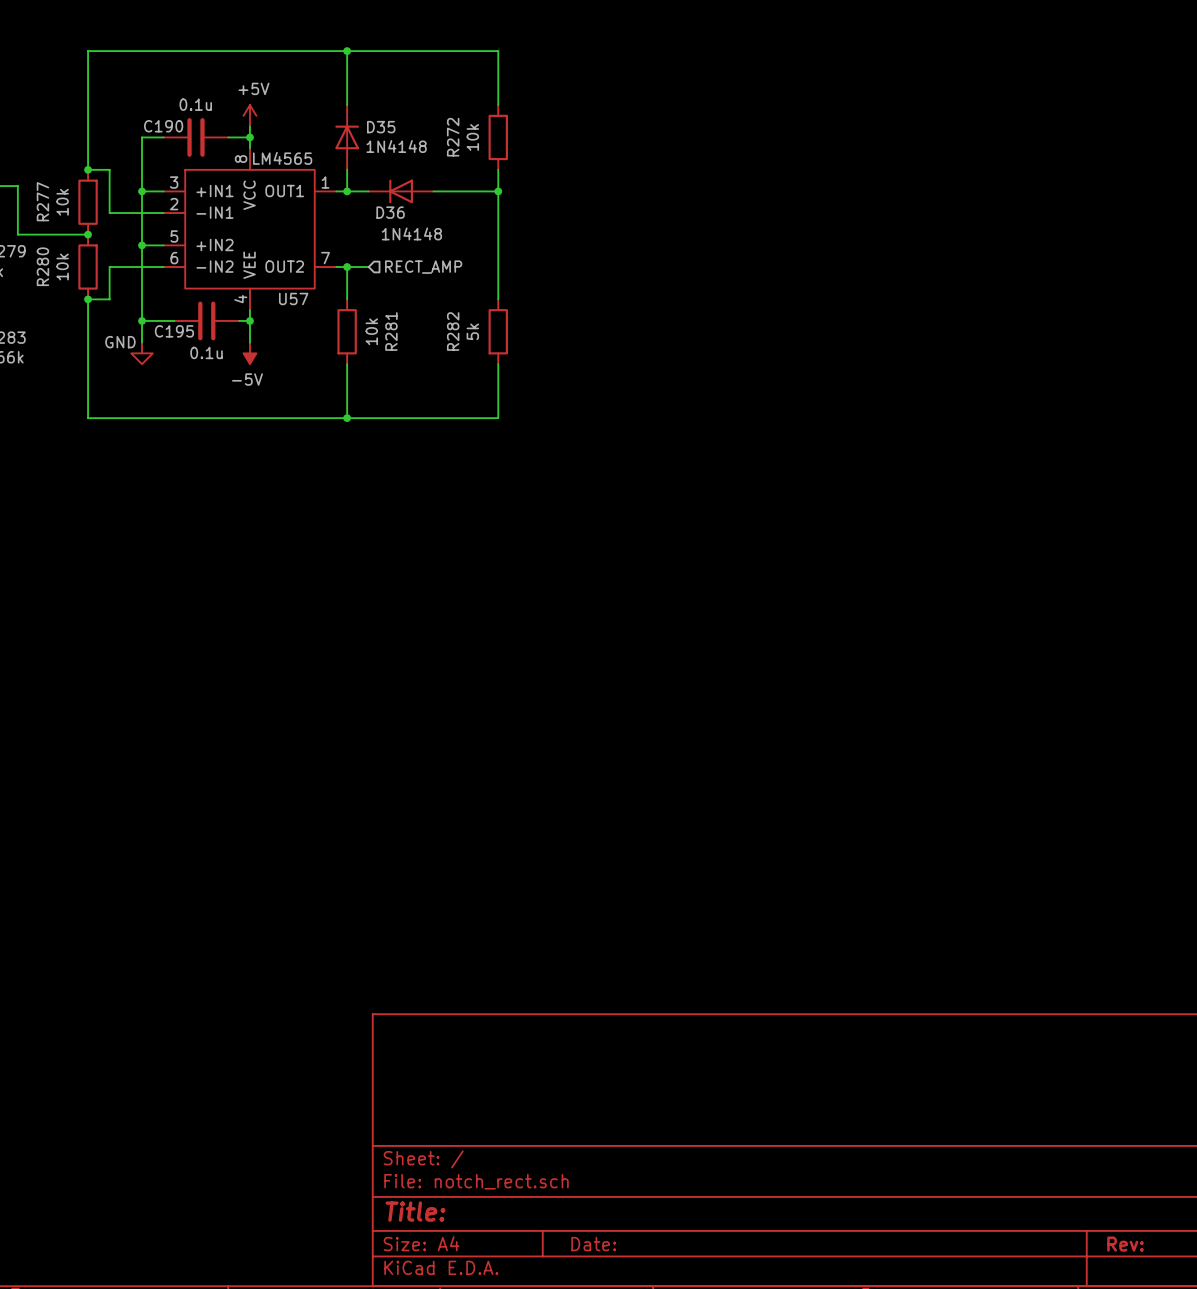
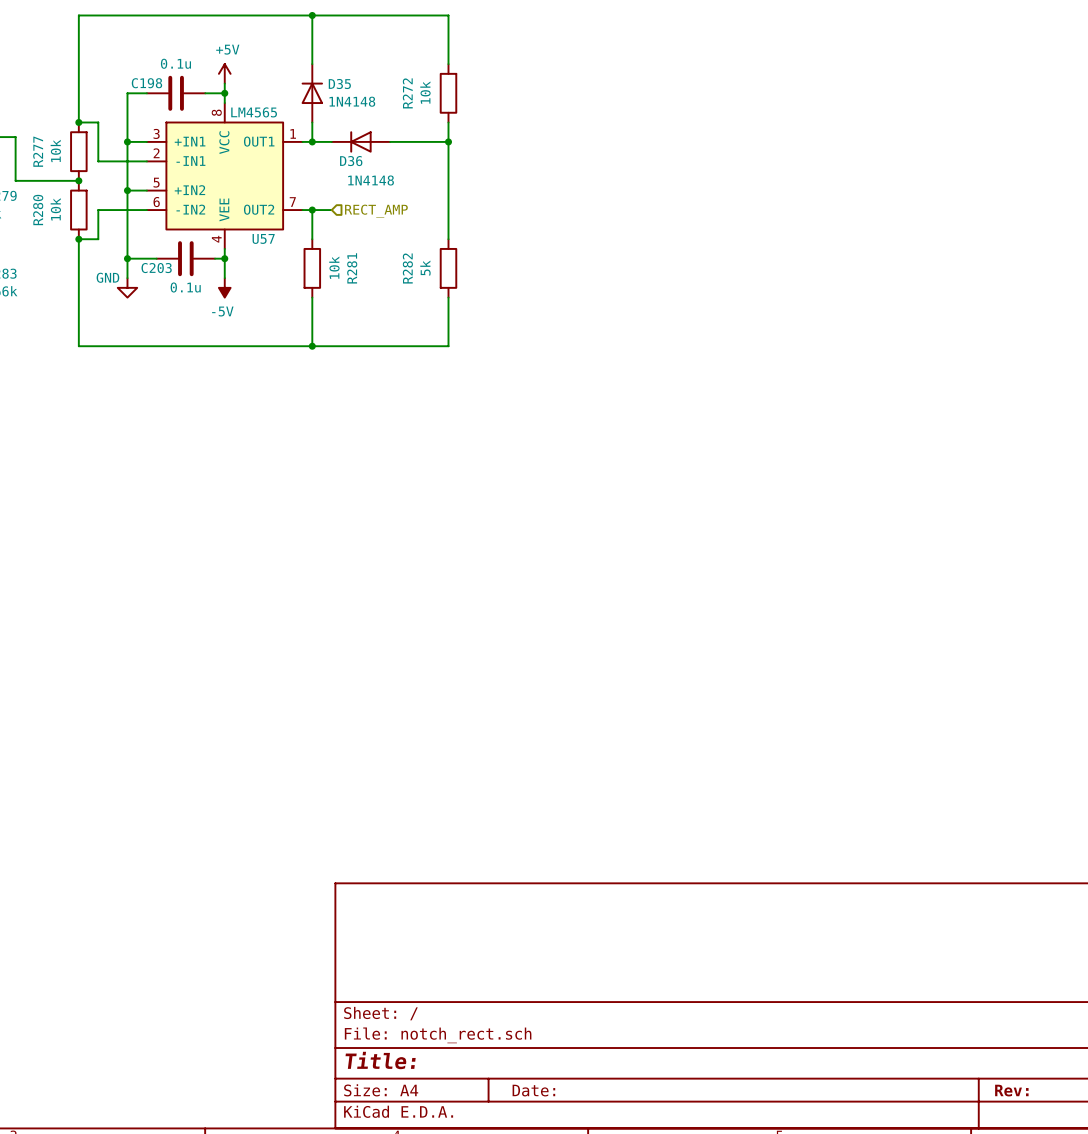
C190 name: C190 (163, 126) -> C198 (146, 83)
C195 name: C195 (174, 331) -> C203 (156, 268)

